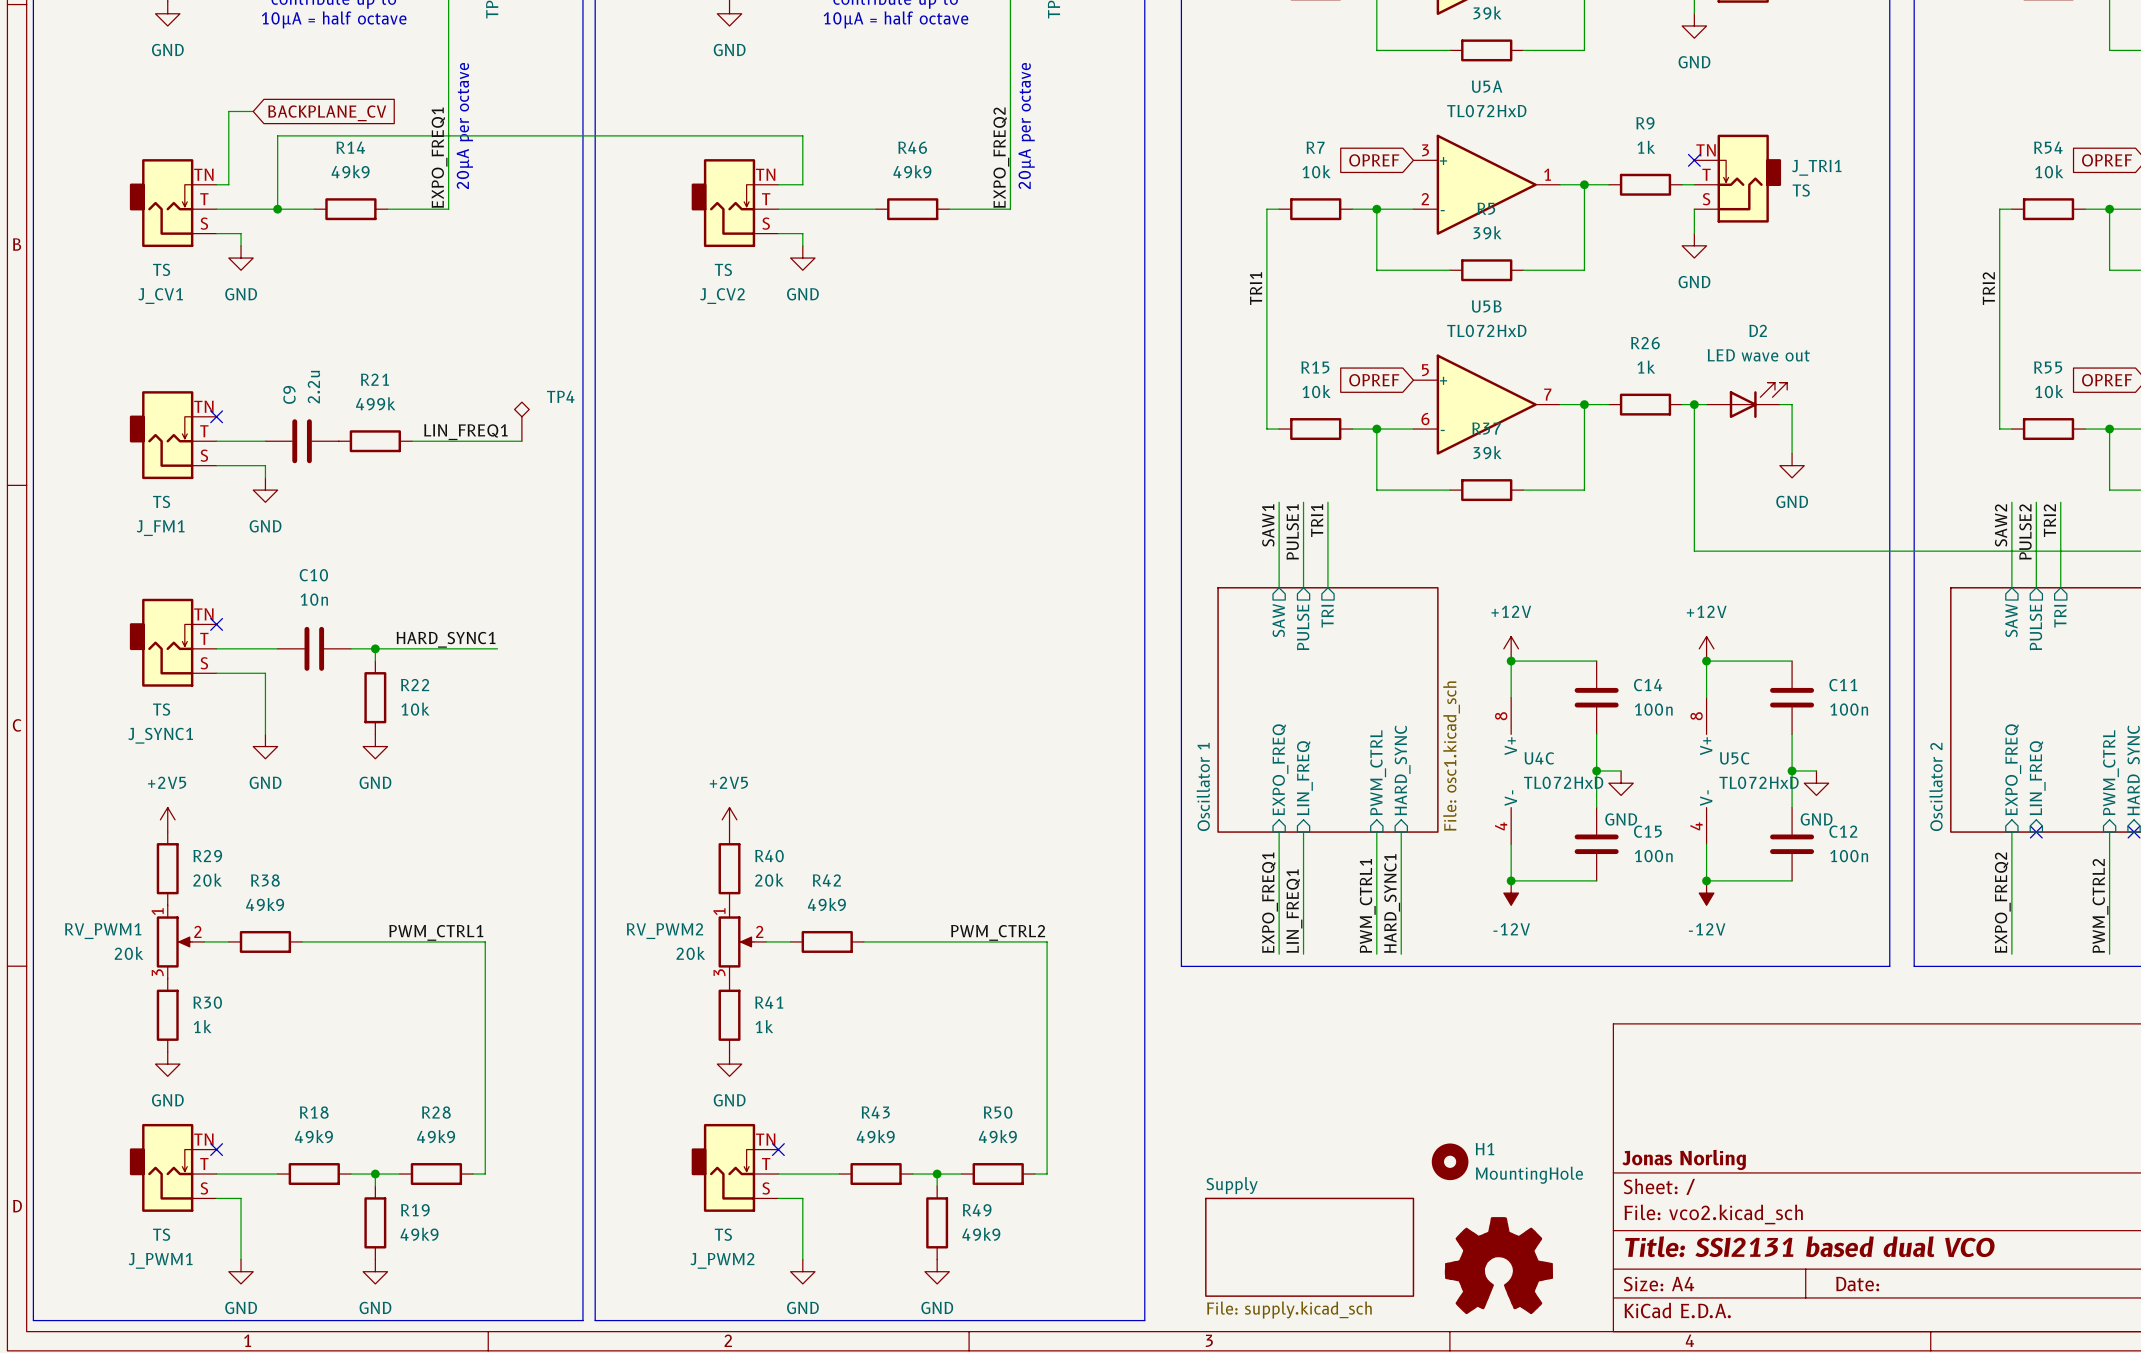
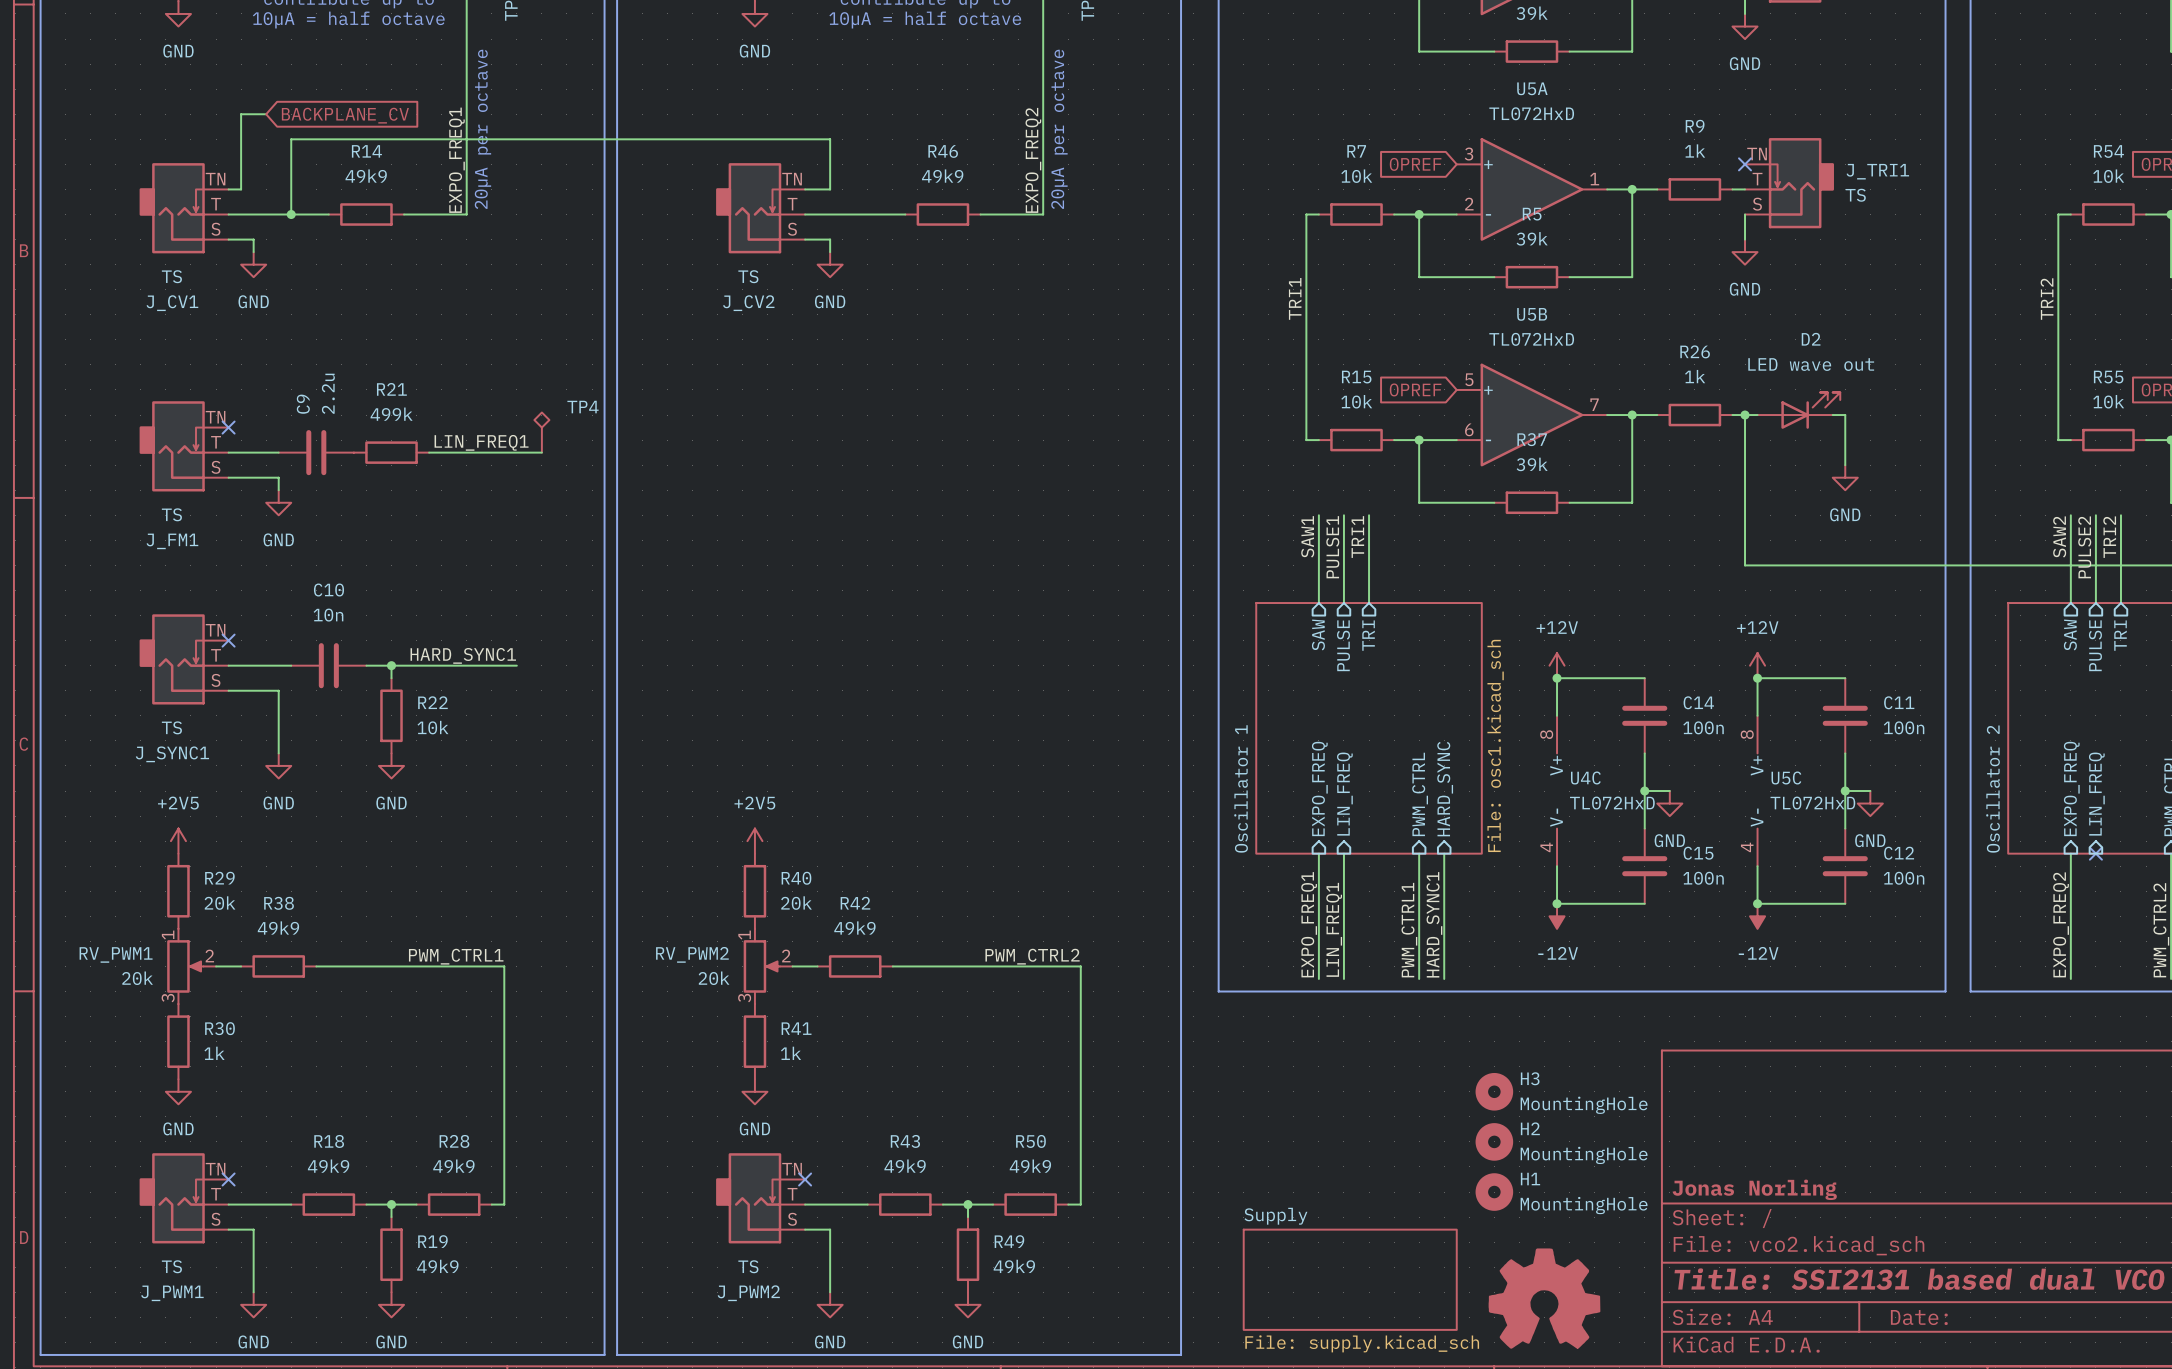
H3: none -> MountingHole (1494, 1091)
H2: none -> MountingHole (1494, 1141)

